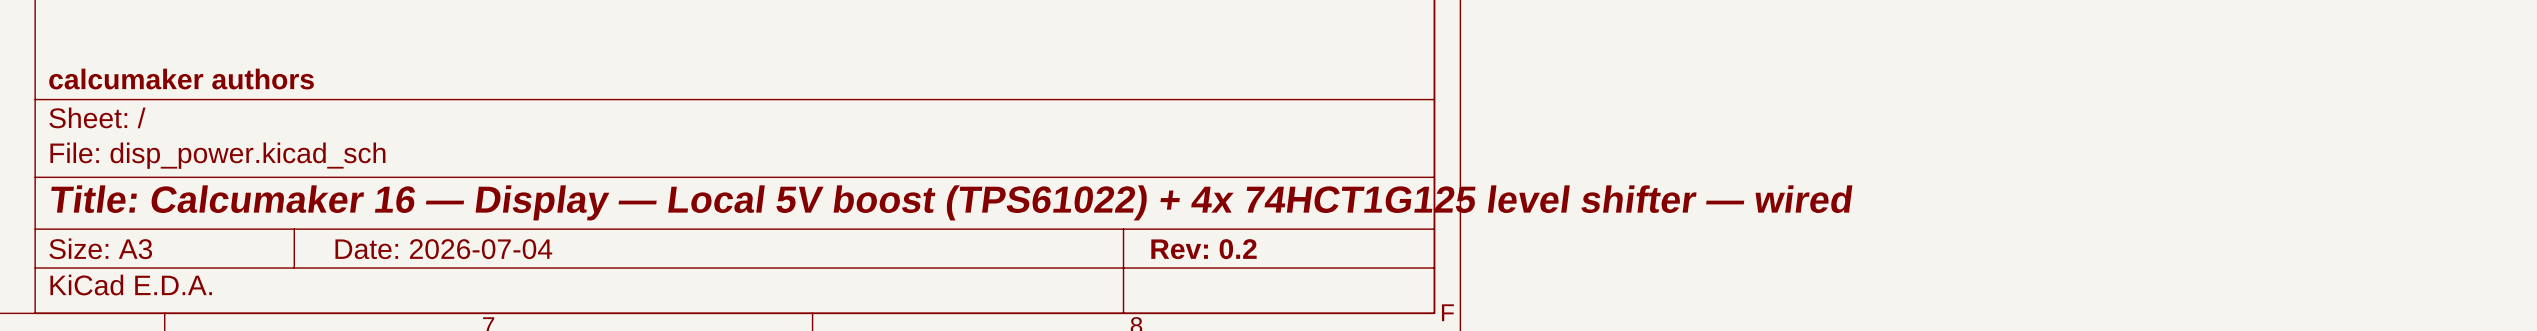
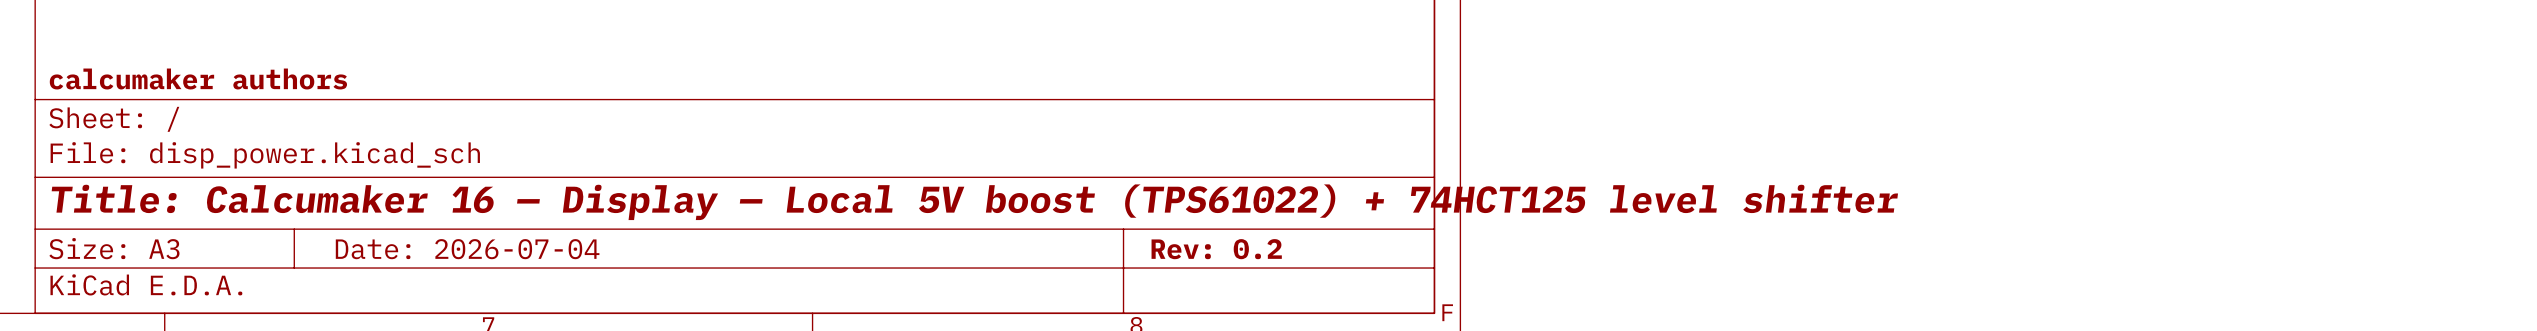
title block: Title: Calcumaker 16 — Display — Local 5V boost (TPS61022) + 4x 74HCT1G125 level shifter — wired (951, 202) -> Title: Calcumaker 16 — Display — Local 5V boost (TPS61022) + 74HCT125 level shifter (974, 202)

